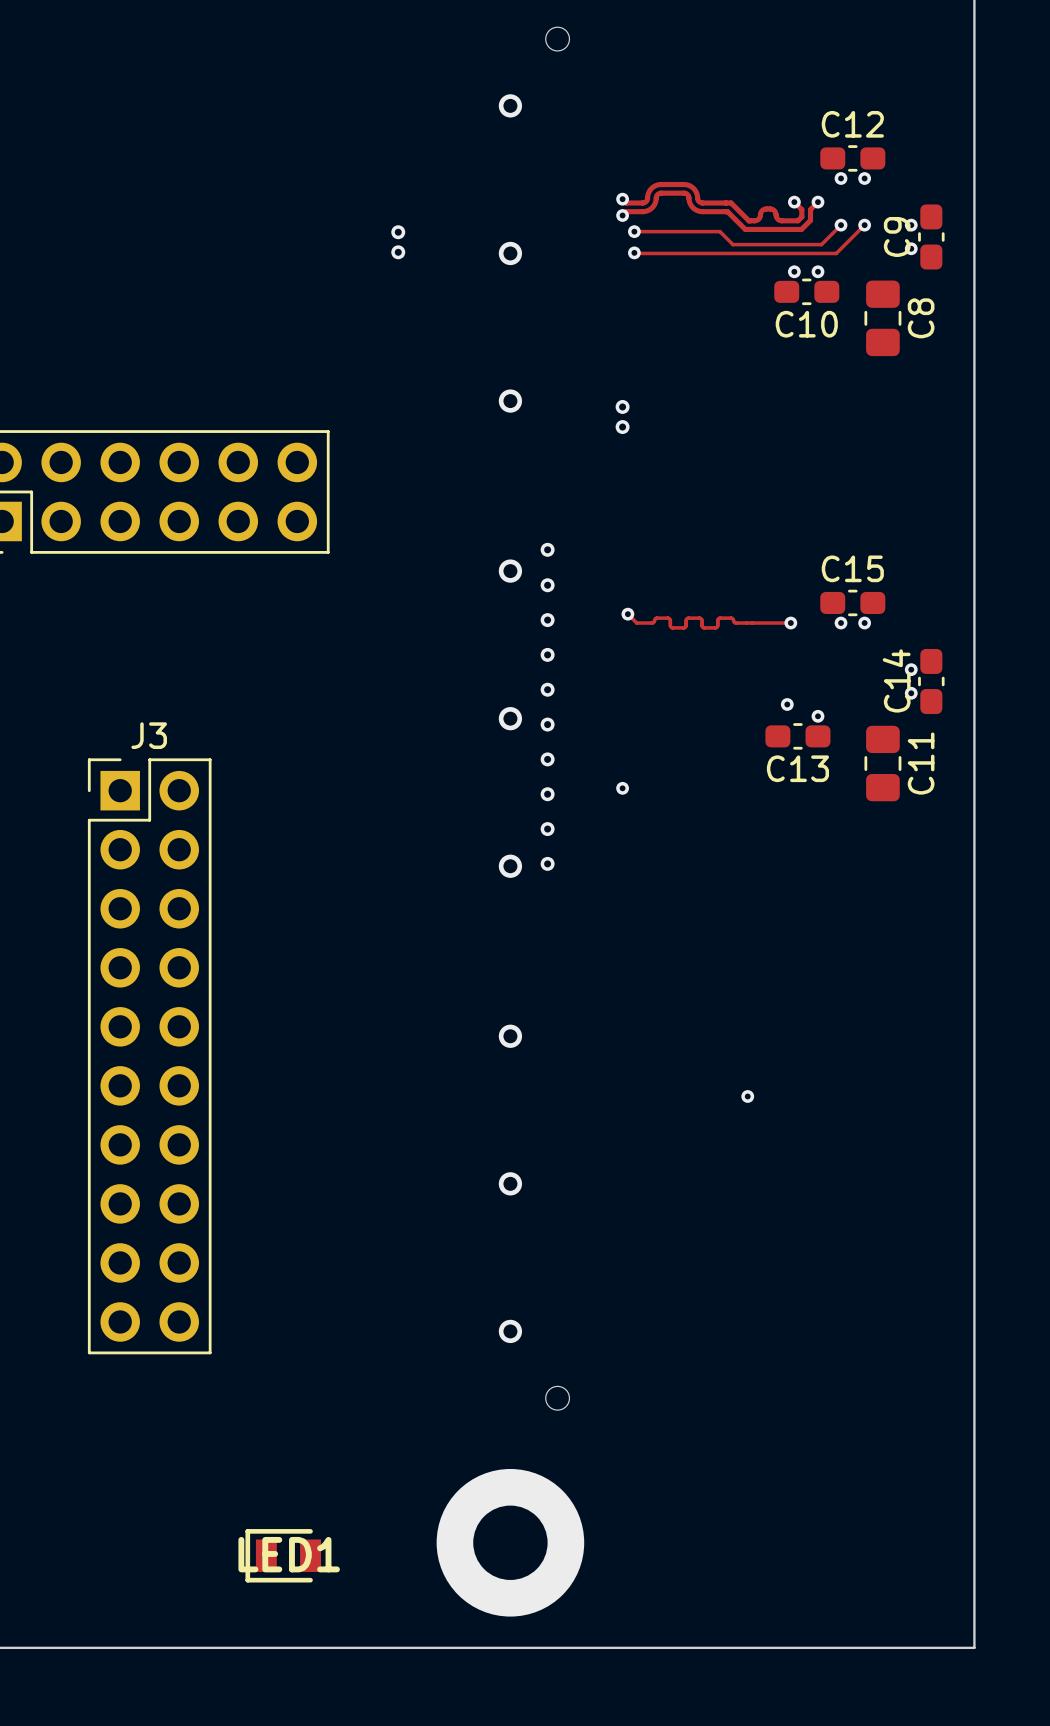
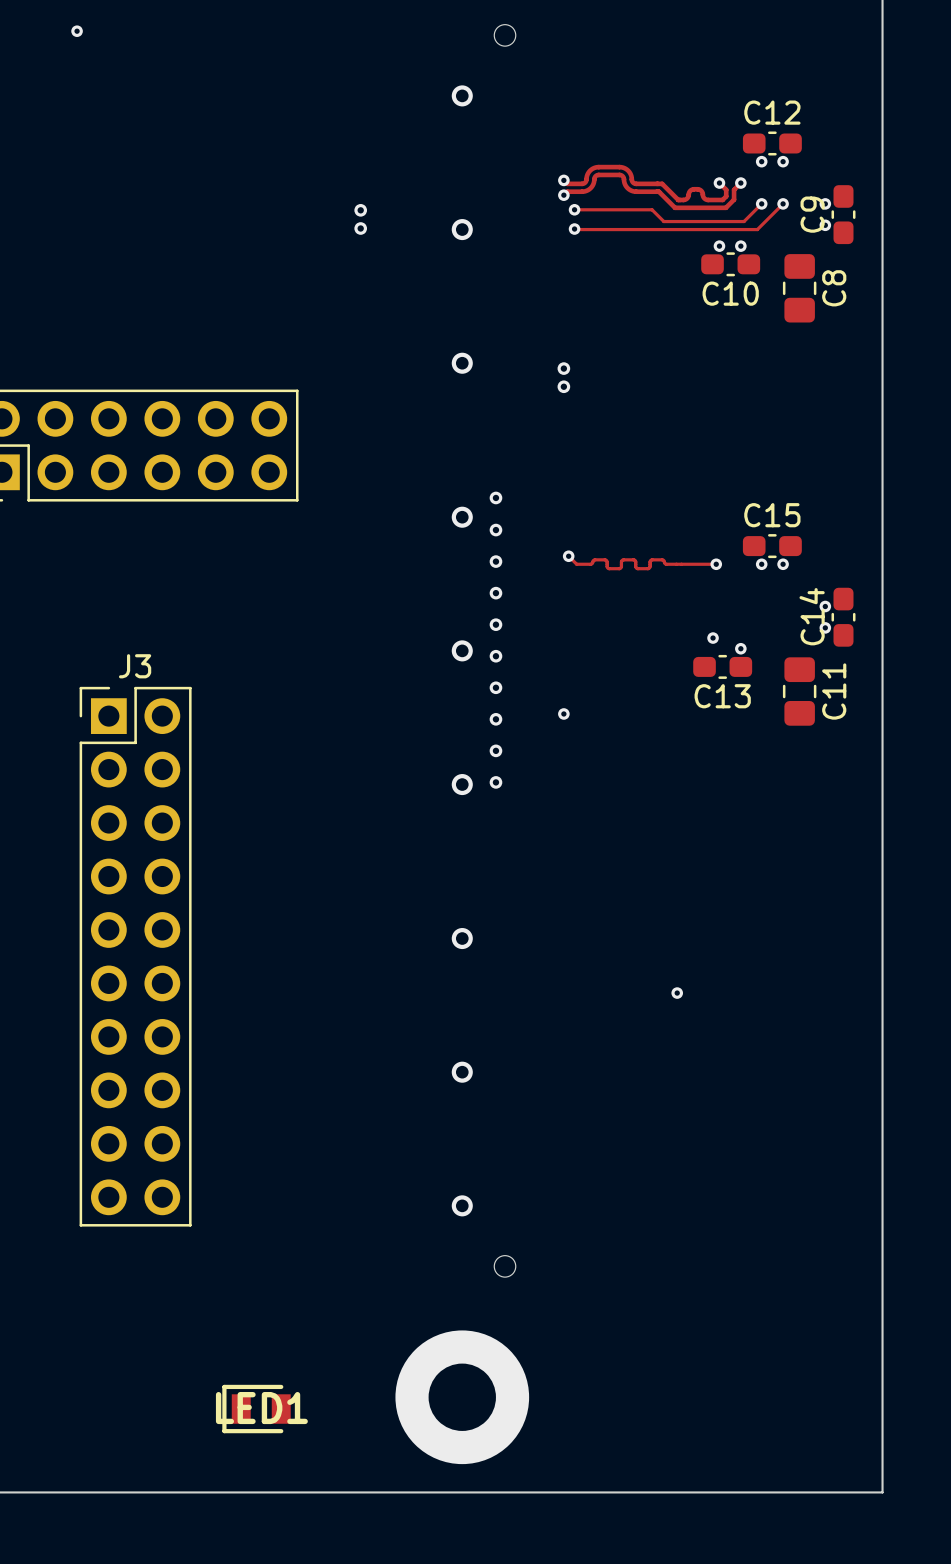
via: none -> (77, 31)

